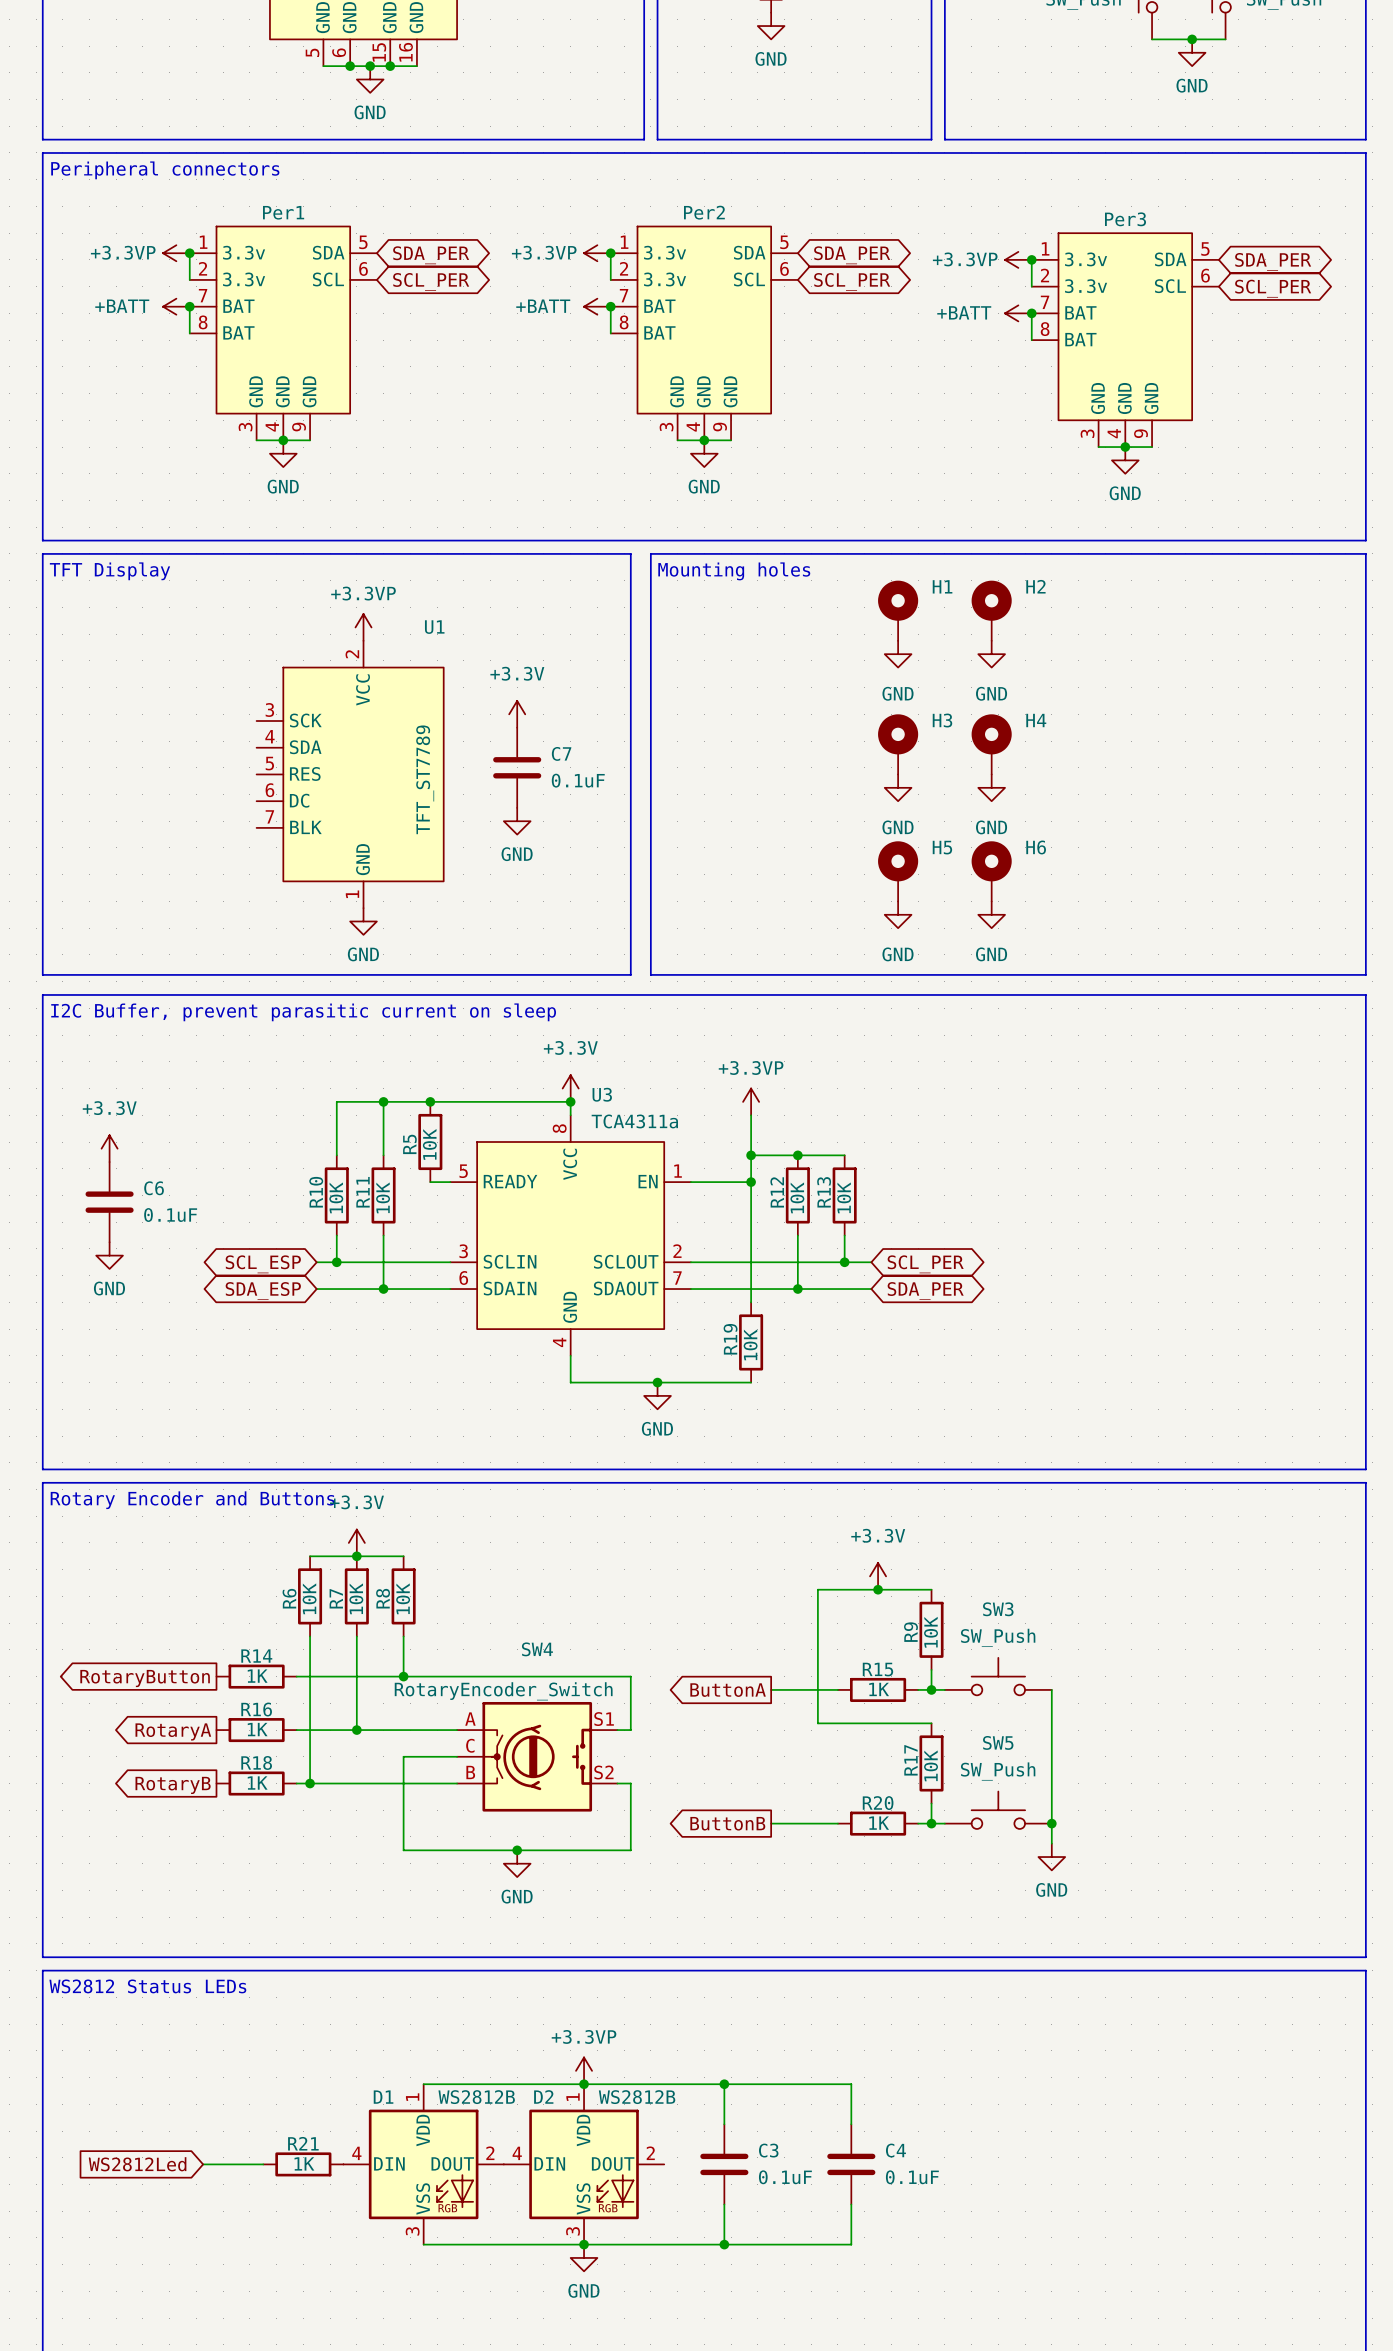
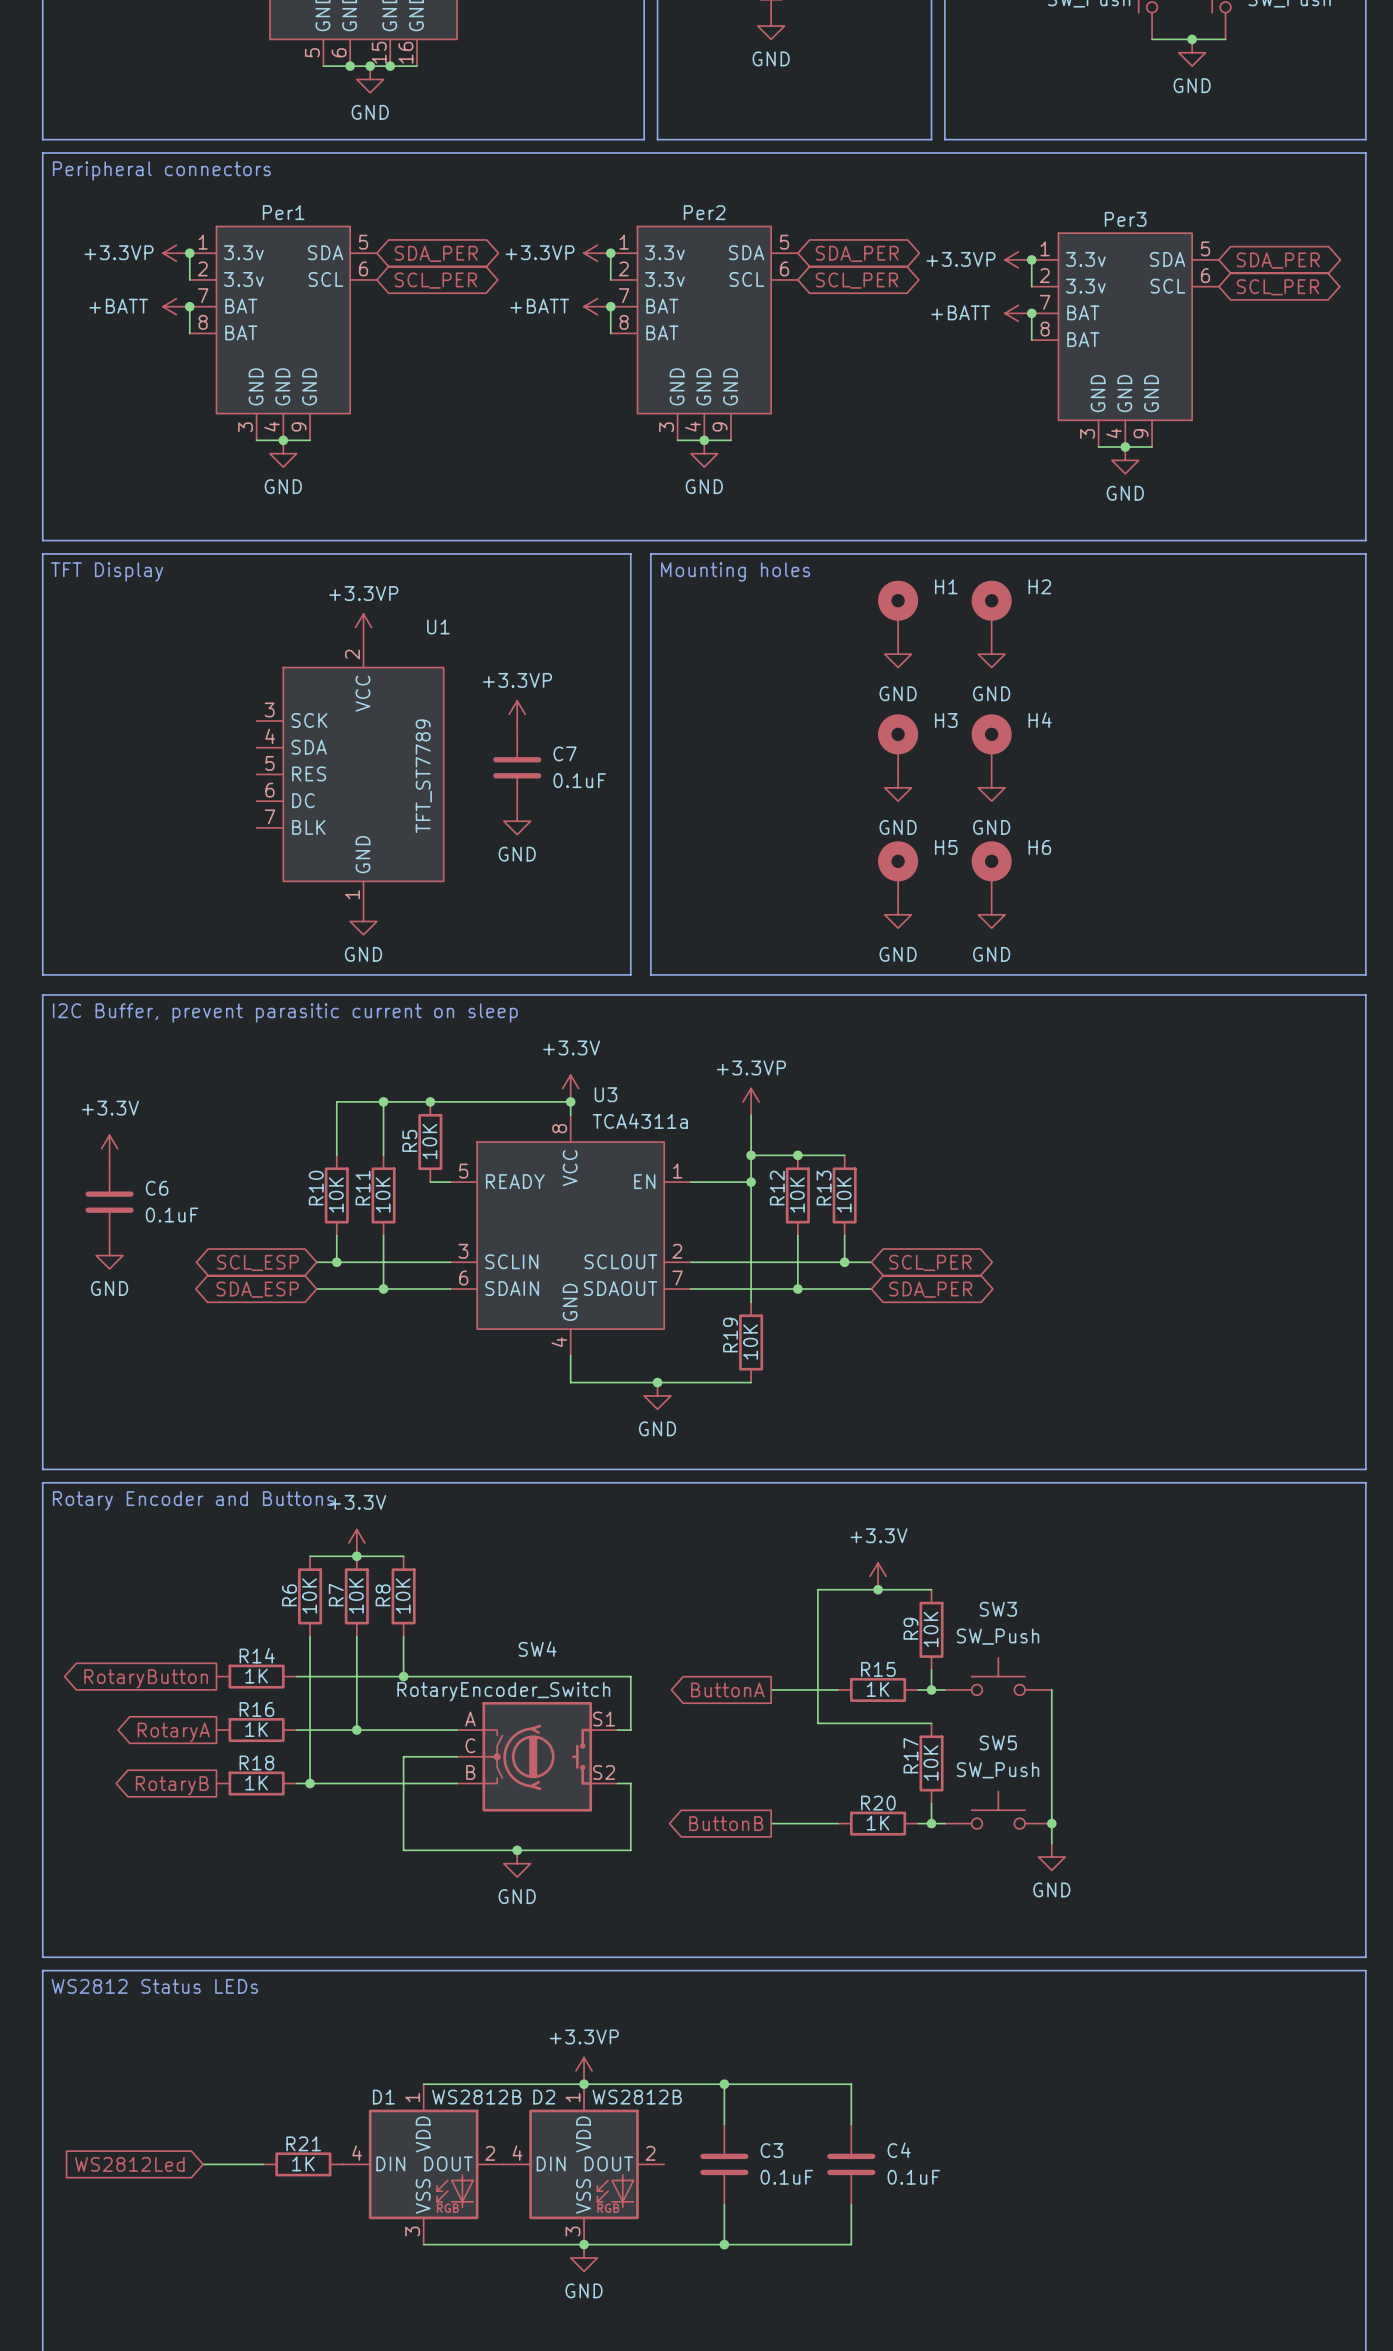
power symbol: +3.3V (517, 714) -> +3.3VP (517, 714)

